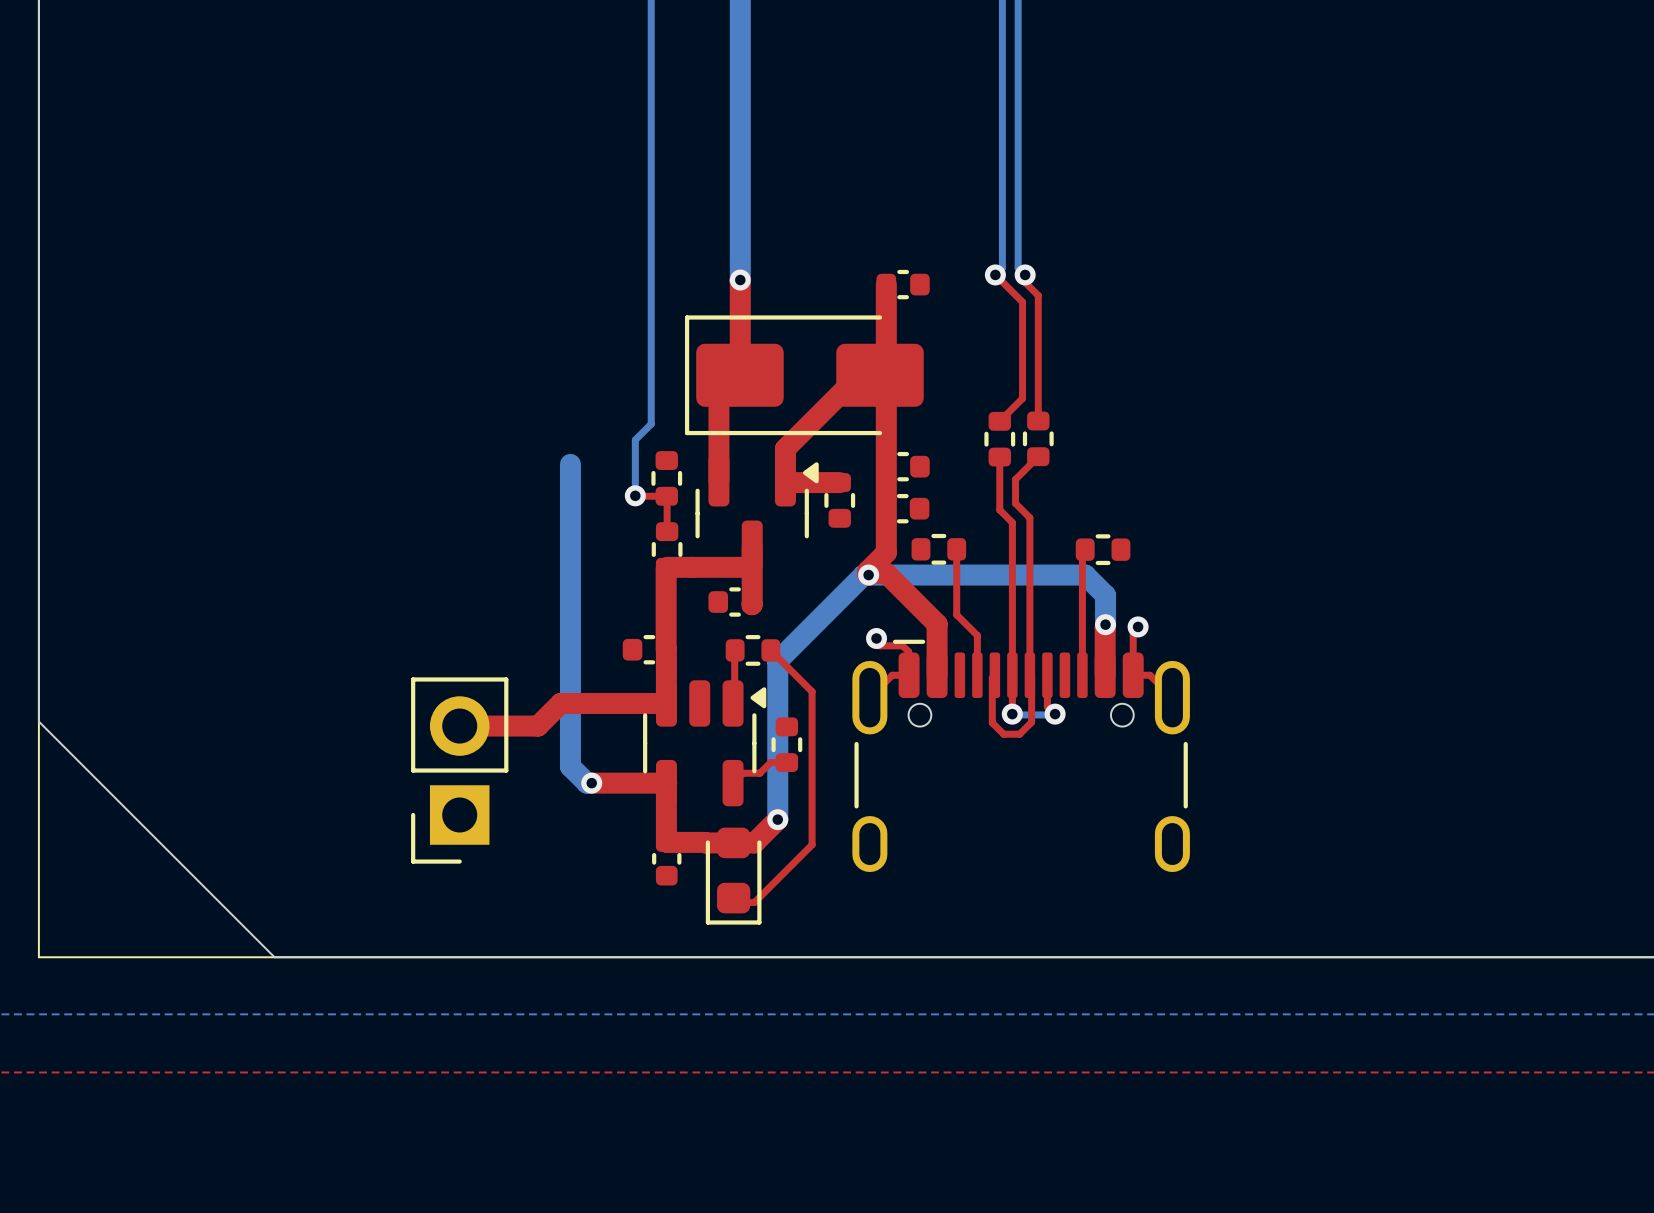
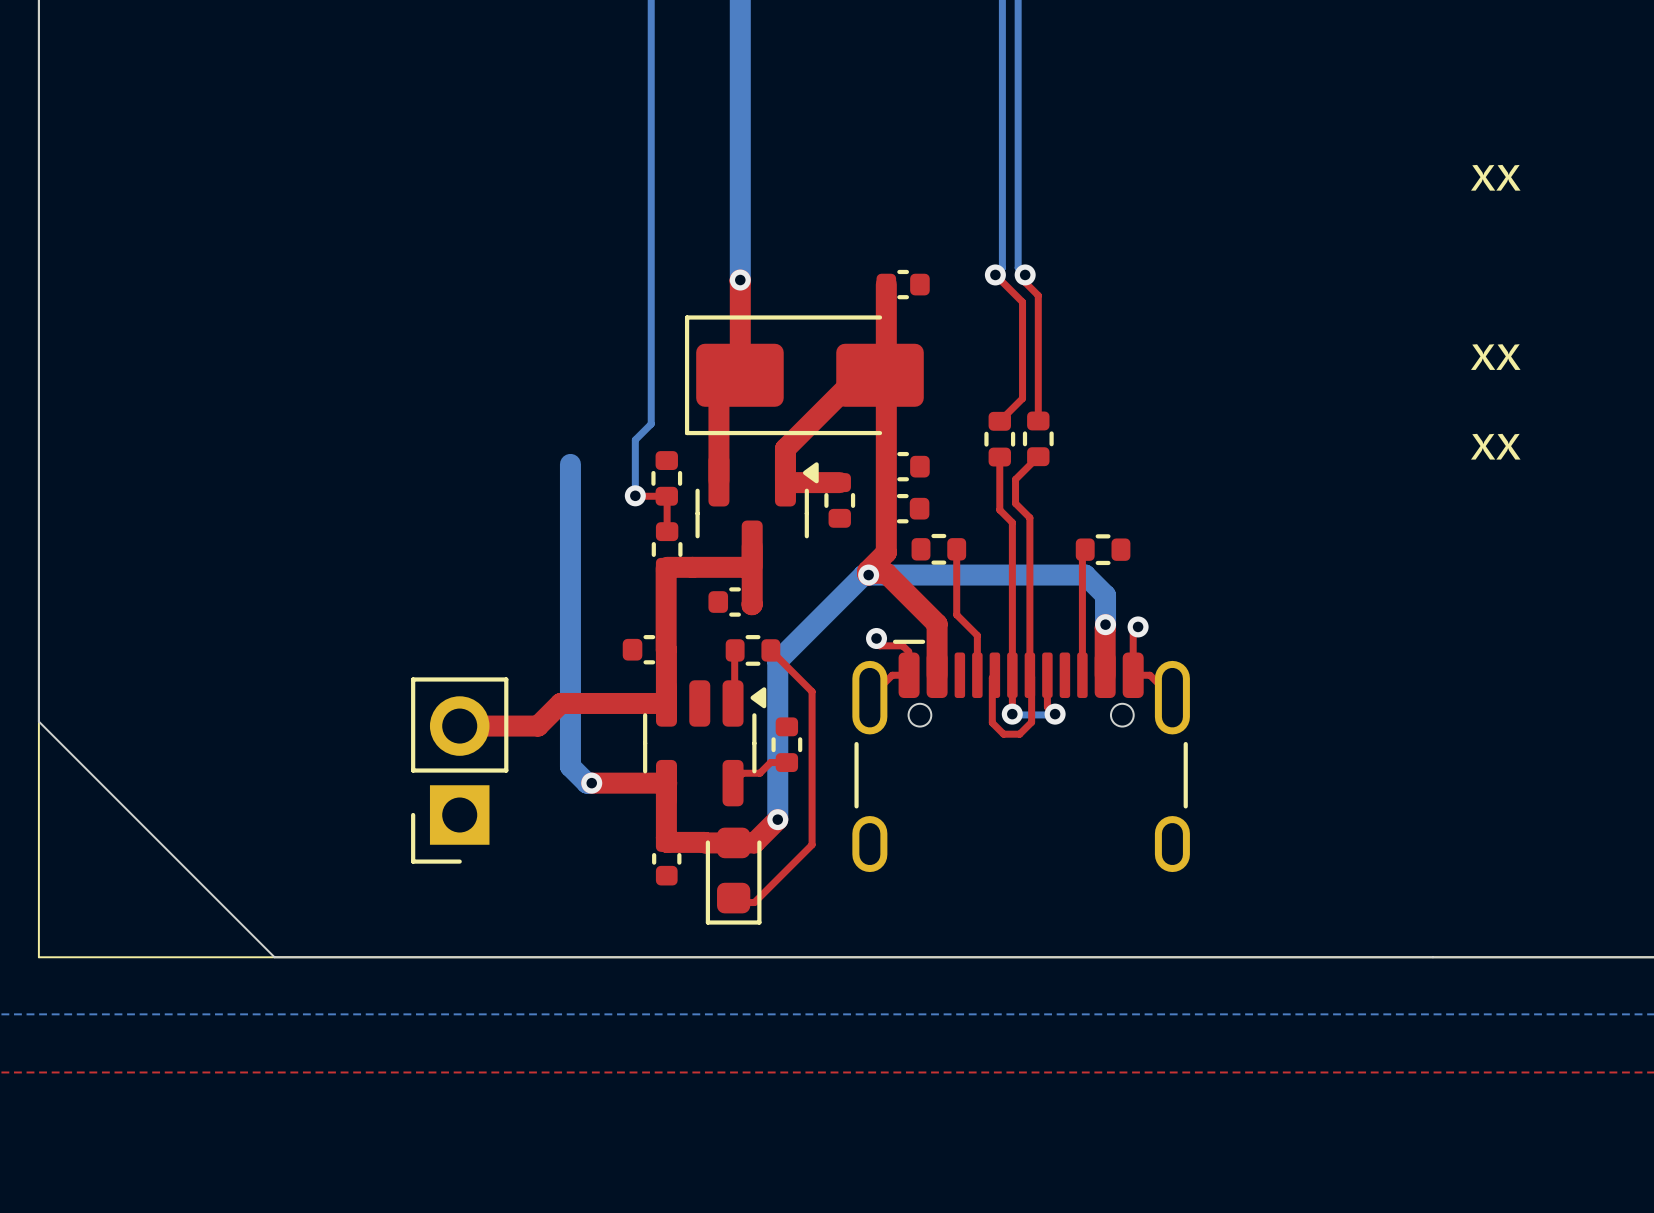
text: none -> xx (1495, 177)
text: none -> xx (1495, 357)
text: none -> xx (1495, 446)

